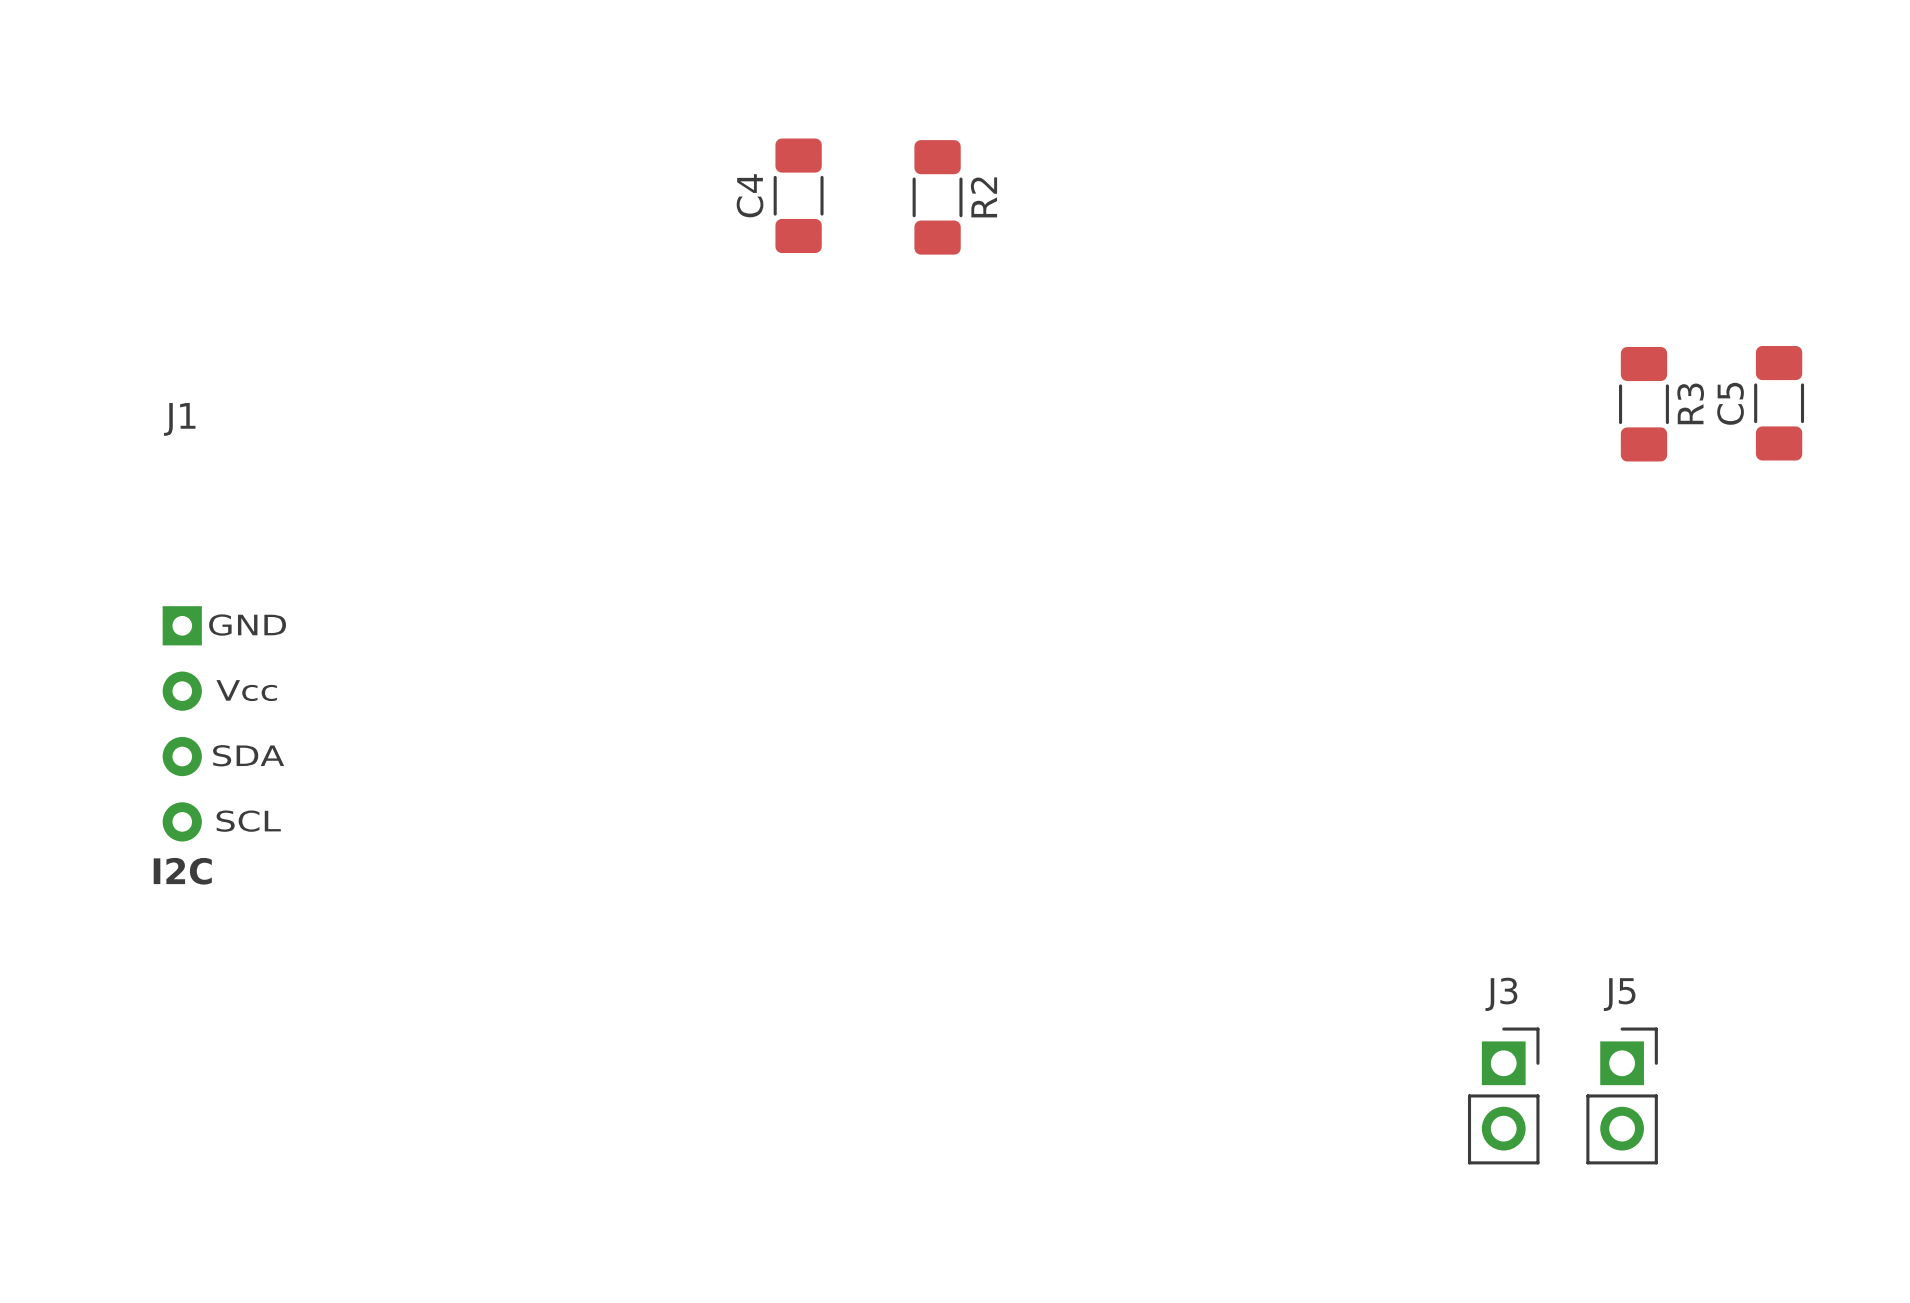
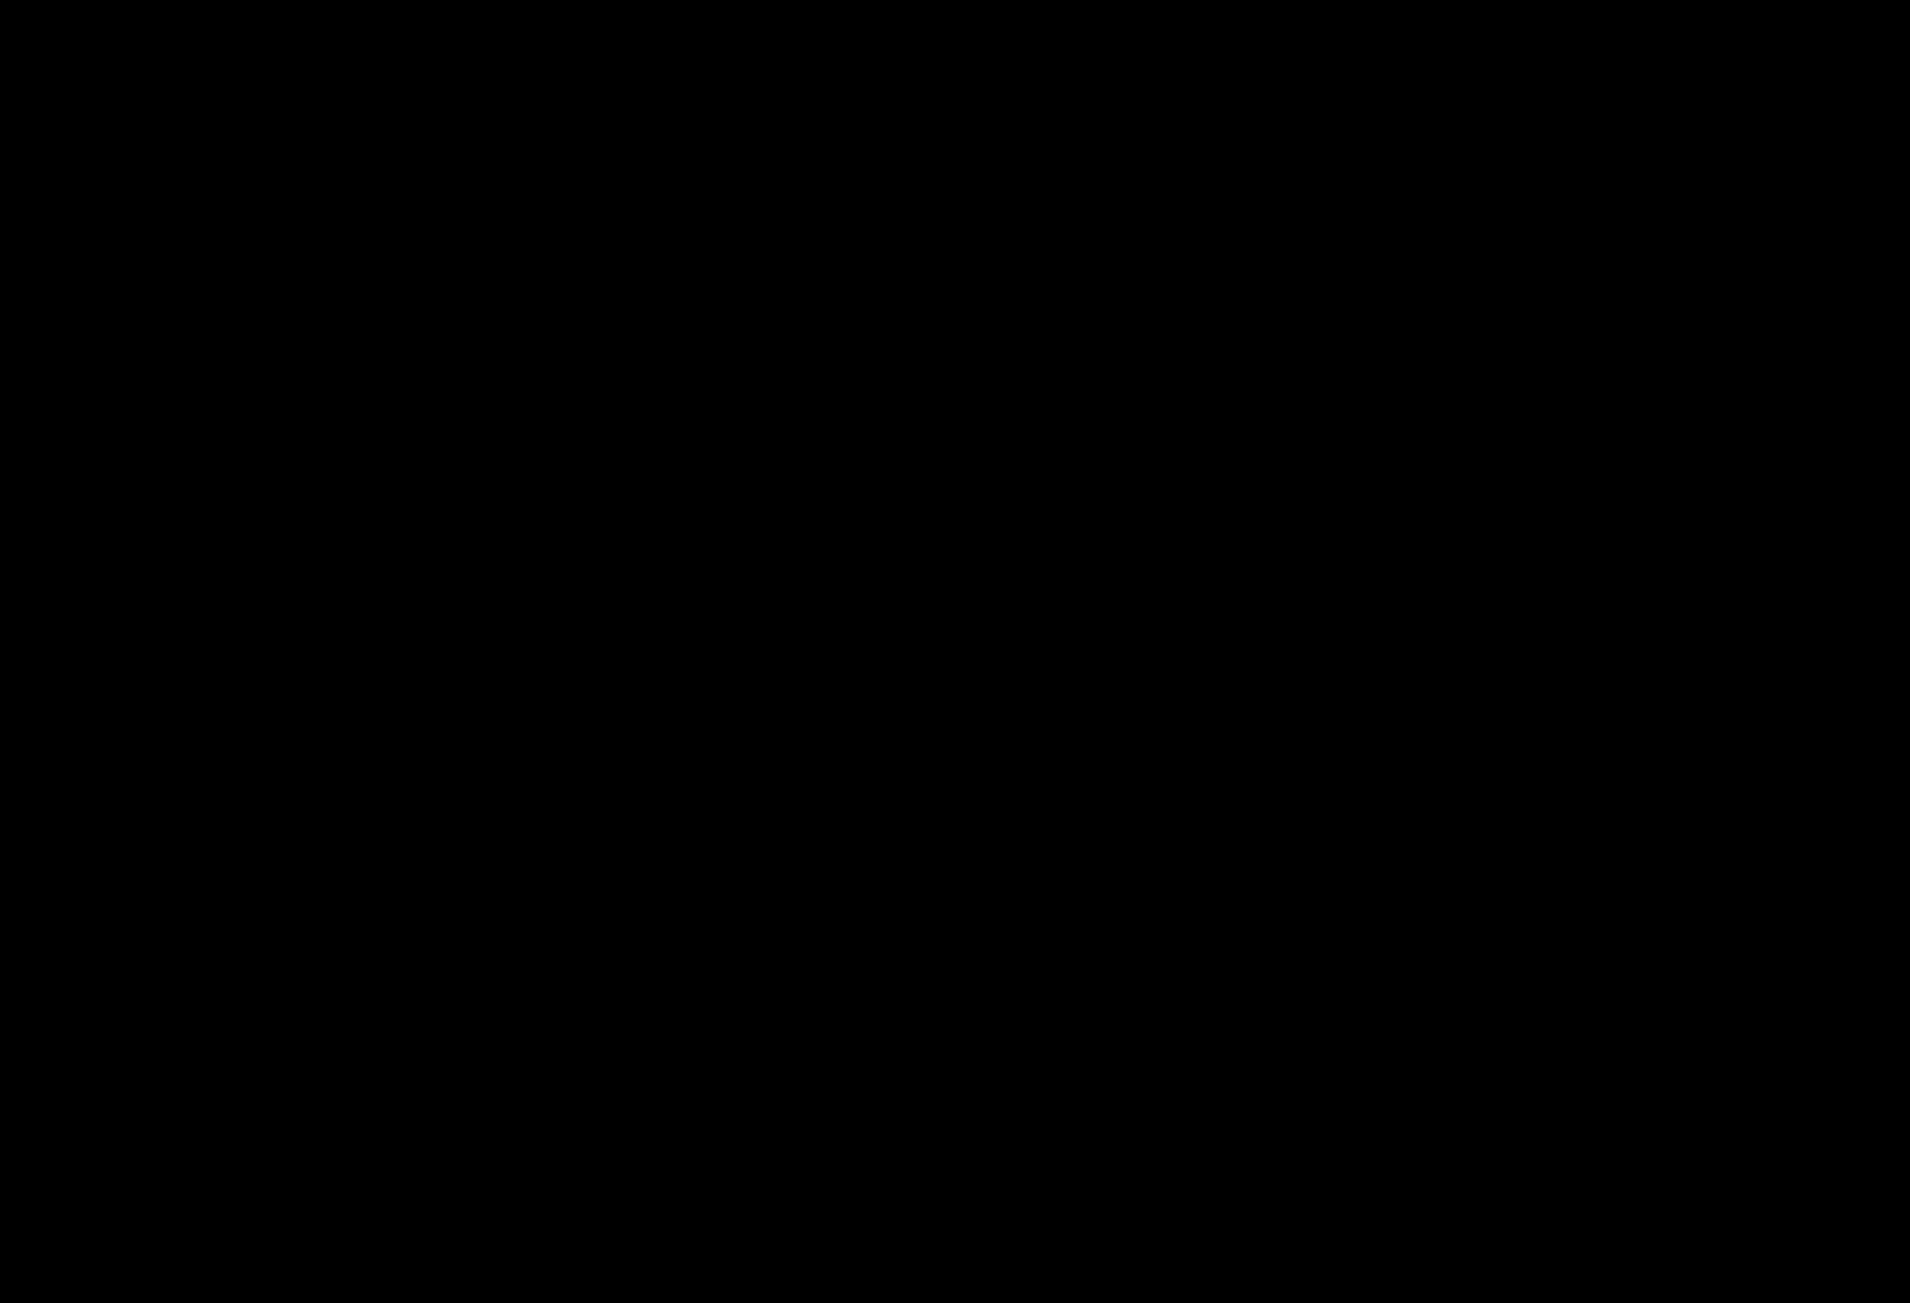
C4: (798, 195) -> none
R2: (937, 197) -> none
C5: (1779, 403) -> none
R3: (1643, 404) -> none
J1: (182, 723) -> none
J3: (1503, 1095) -> none
J5: (1622, 1095) -> none

